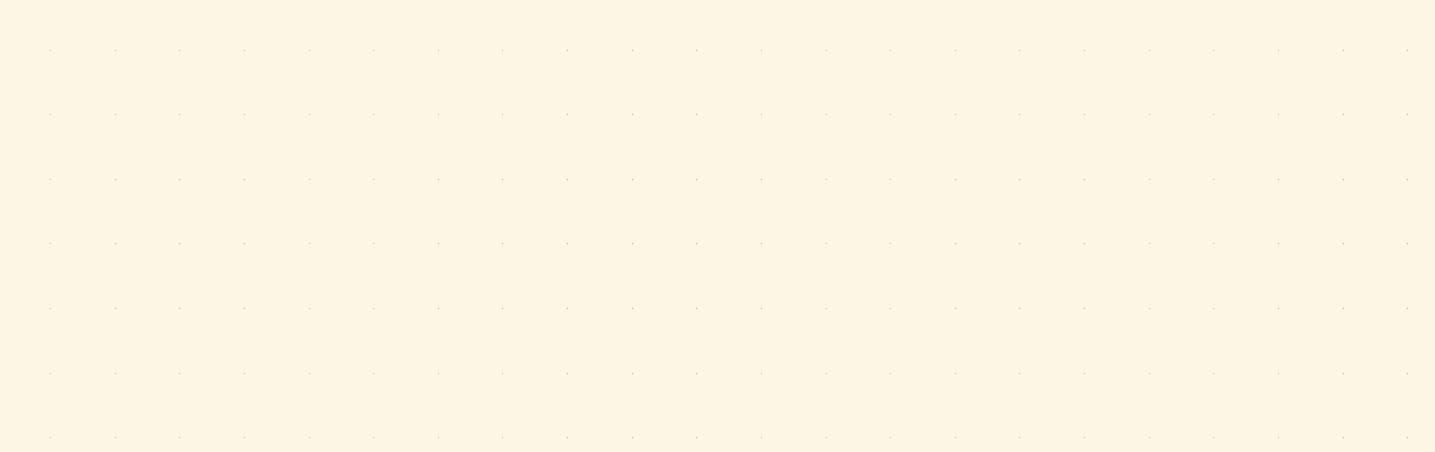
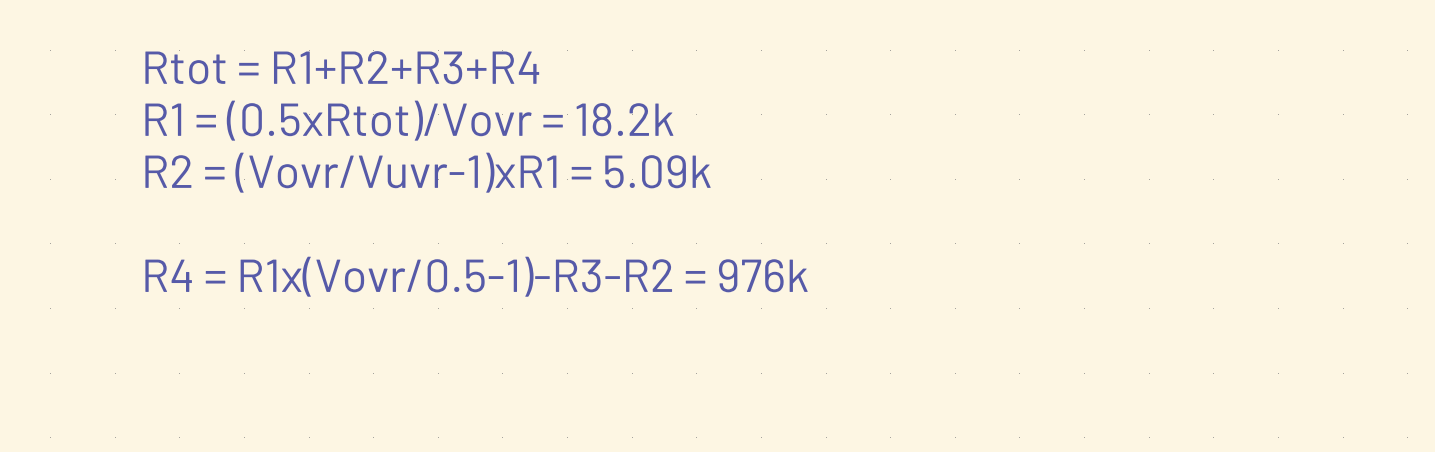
text: none -> Rtot = R1+R2+R3+R4 (342, 67)
text: none -> R1 = (0.5xRtot)/Vovr = 18.2k (409, 120)
text: none -> R2 = (Vovr/Vuvr-1)xR1 = 5.09k (428, 172)
text: none -> R4 = R1x(Vovr/0.5-1)-R3-R2 = 976k (476, 276)

